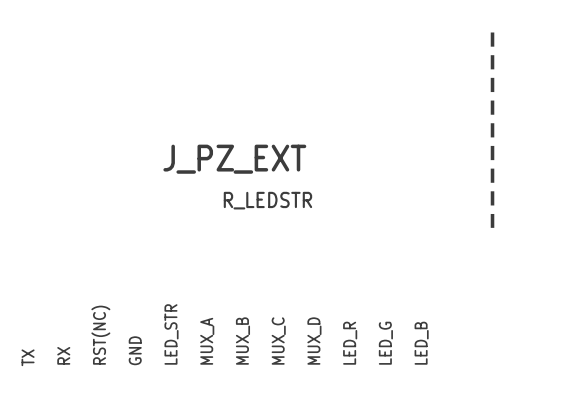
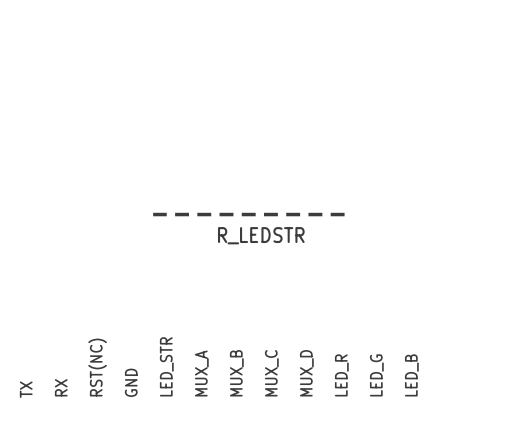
line: (492, 32) (492, 227) -> none
text: J_PZ_EXT (234, 159) -> none
line: none -> (344, 214) (153, 214)

